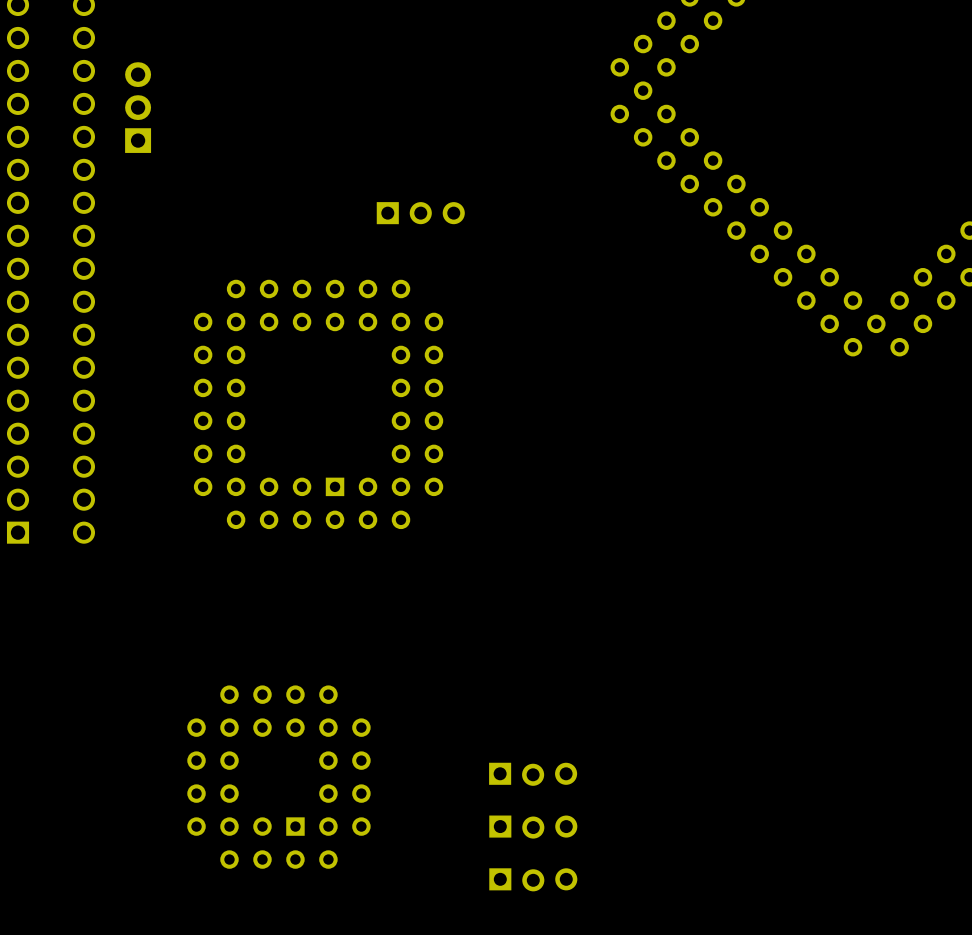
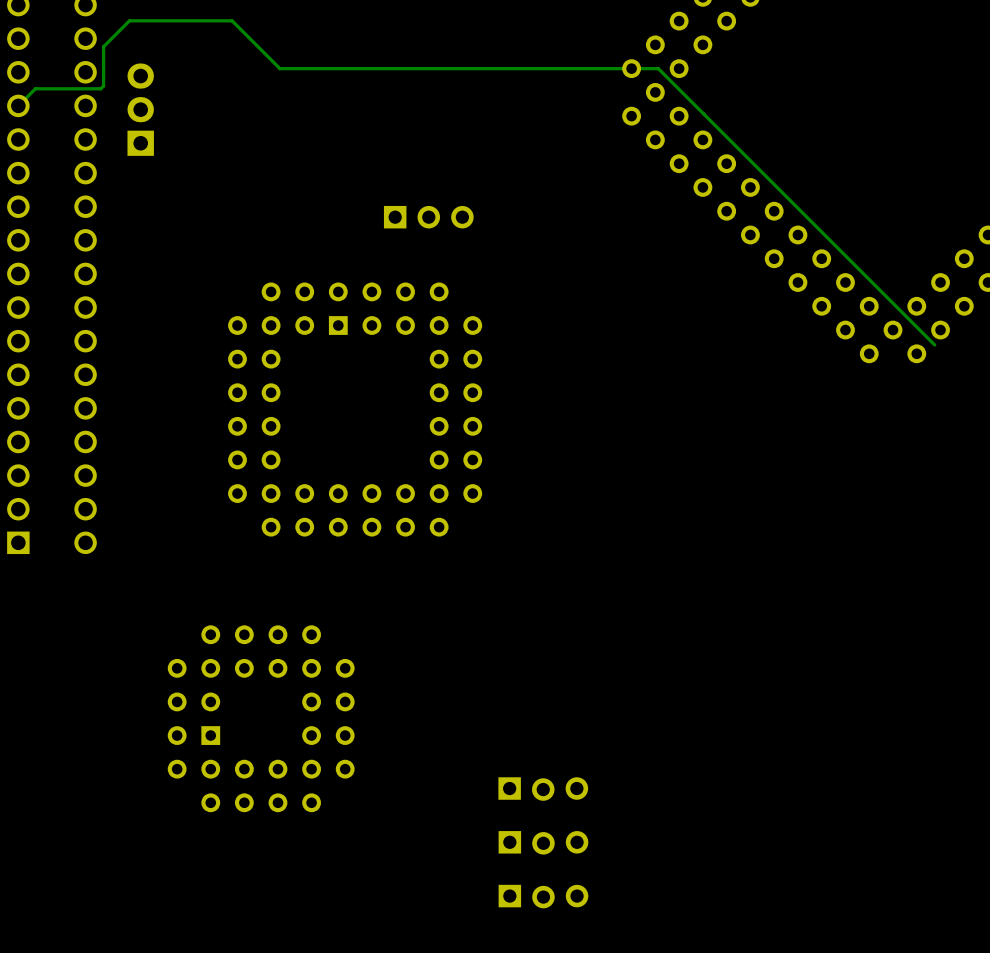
track: none -> (18, 105) (35, 88) (100, 88) (103, 86) (103, 46) (129, 20) (232, 20) (279, 68) (658, 68) (934, 344)
part rotation: 0° (318, 404) -> 180° (355, 409)
part rotation: 0° (278, 777) -> 90° clockwise (261, 718)

